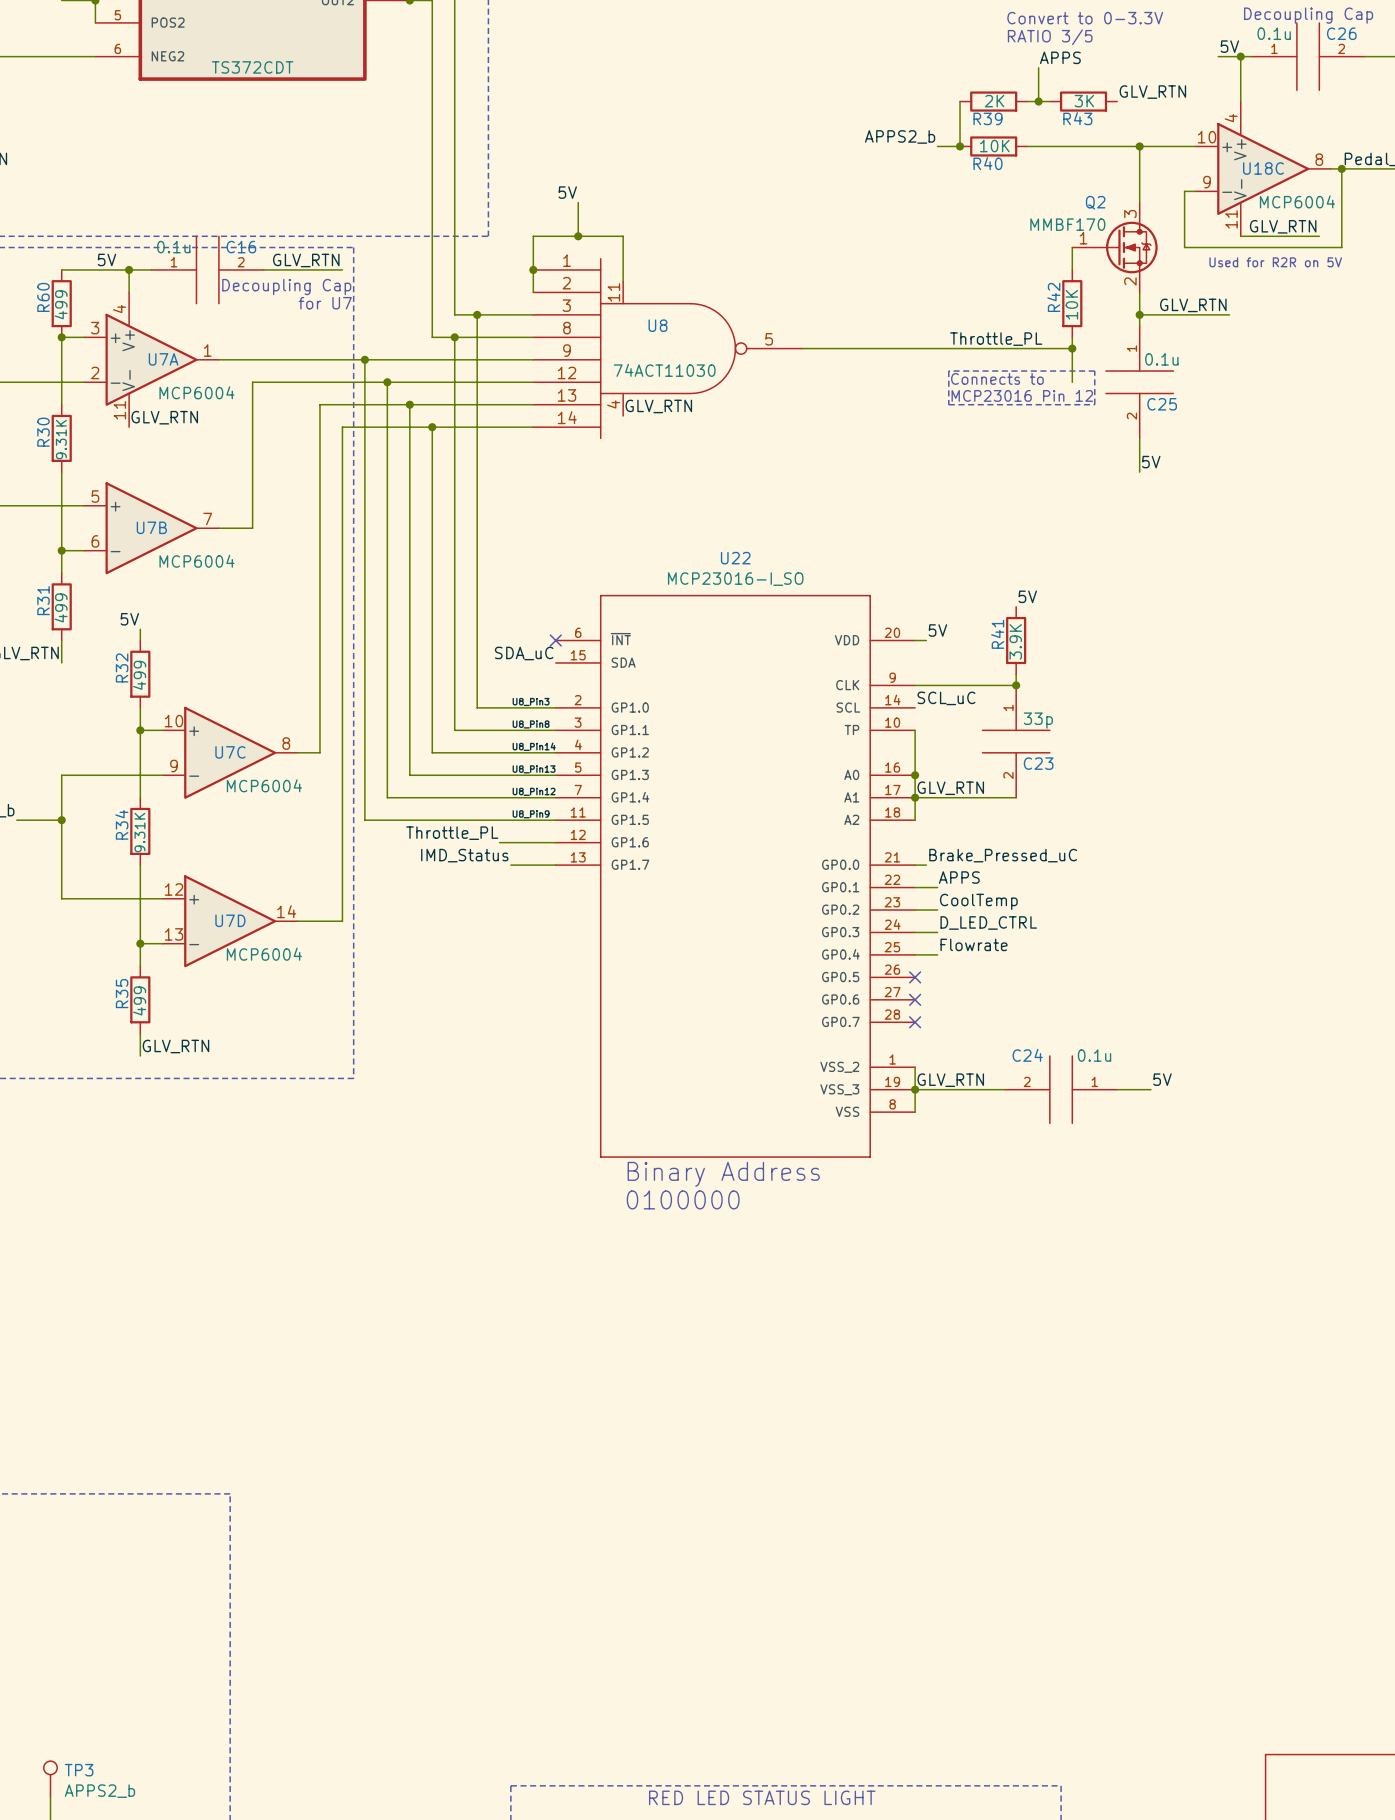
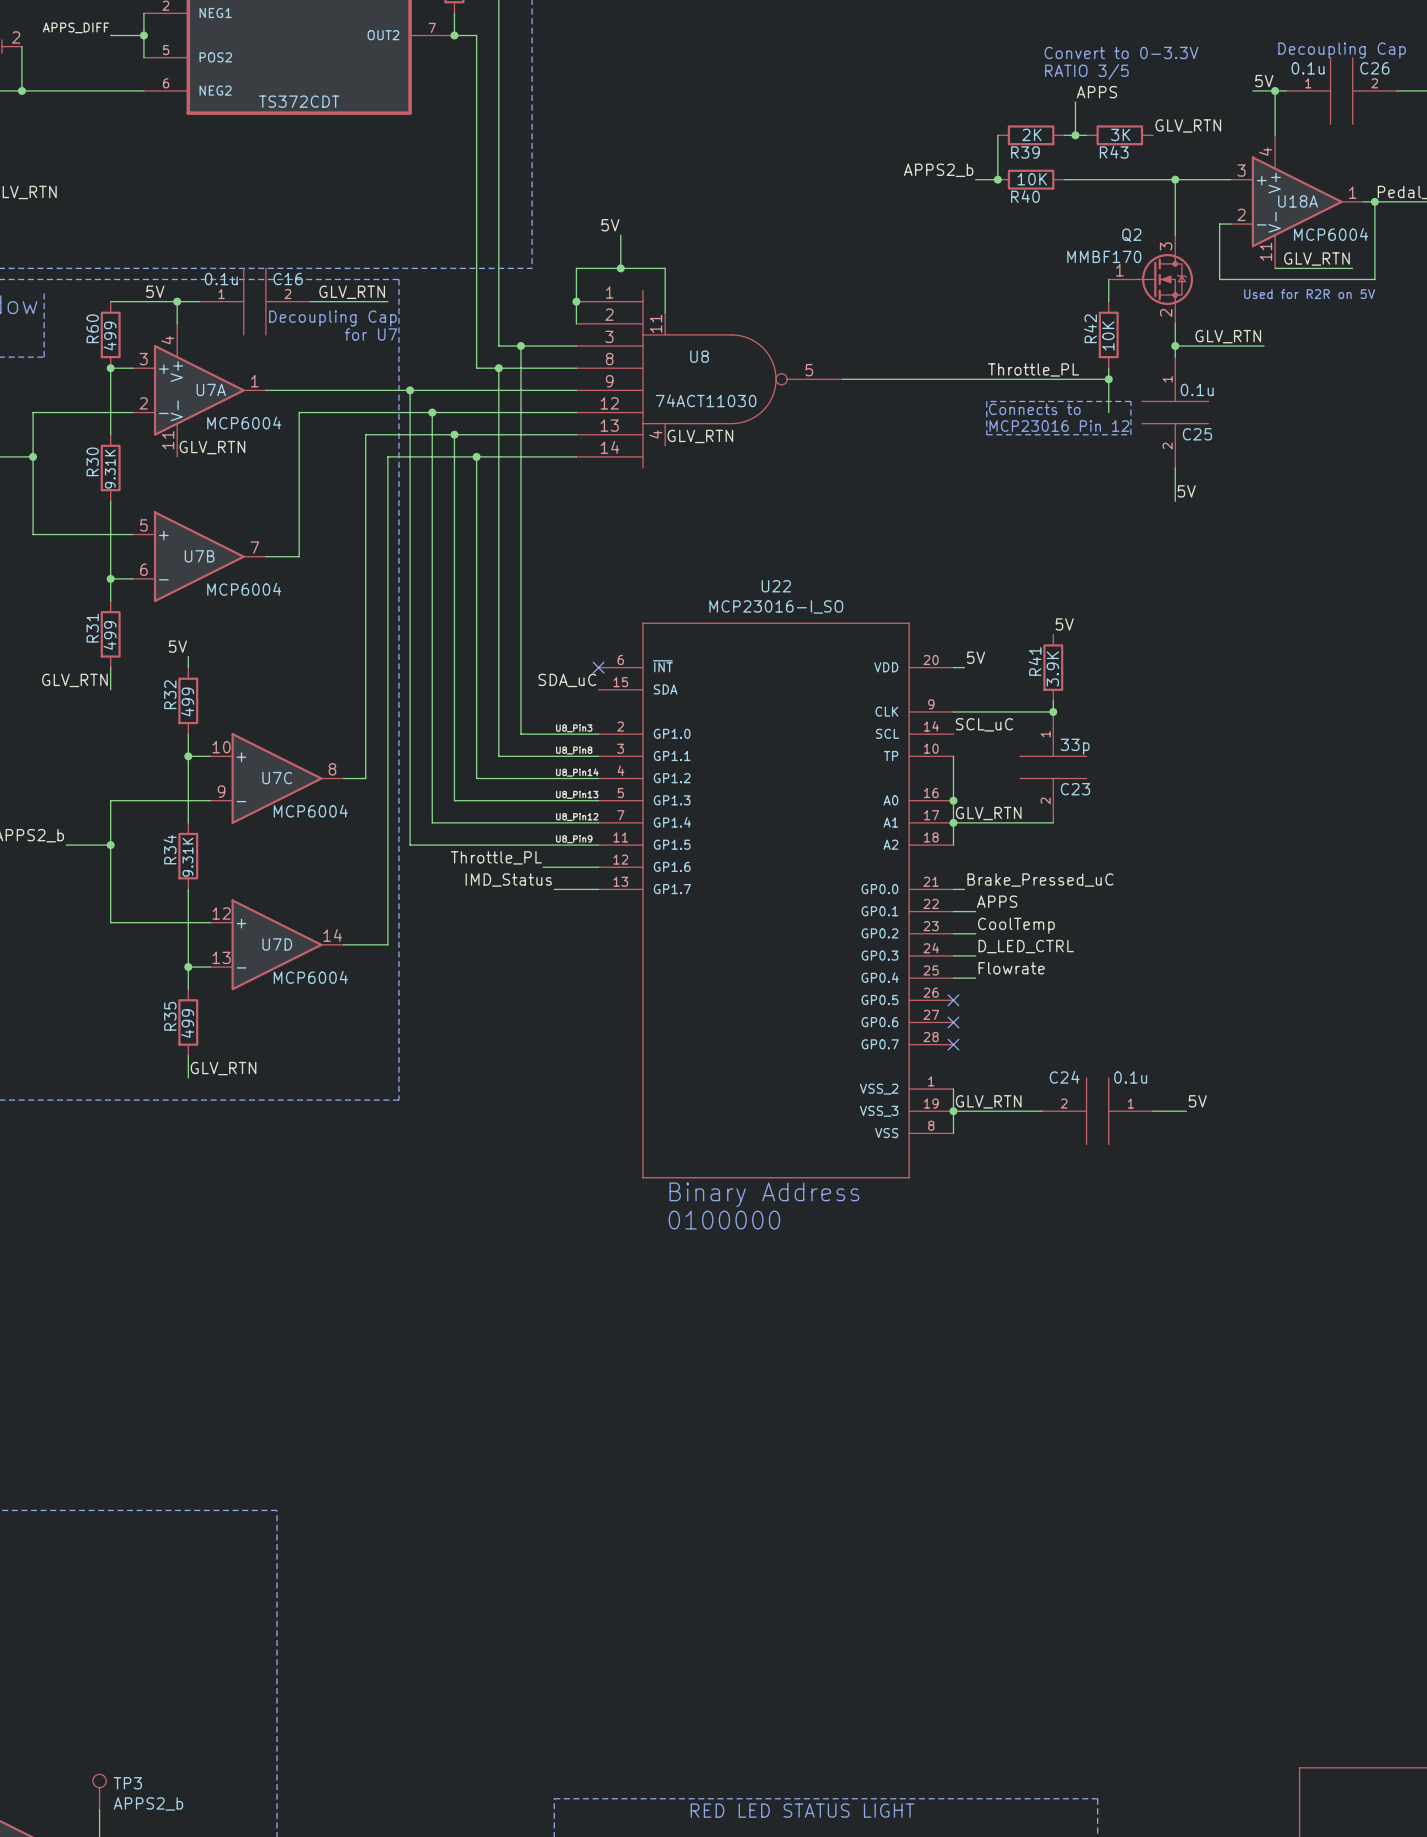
U18C pin number: 10 (1207, 137) -> 3 (1241, 170)
U18C pin number: 8 (1319, 159) -> 1 (1352, 192)
U18C name: U18C (1263, 168) -> U18A (1298, 201)
U18C pin number: 9 (1207, 182) -> 2 (1241, 214)

